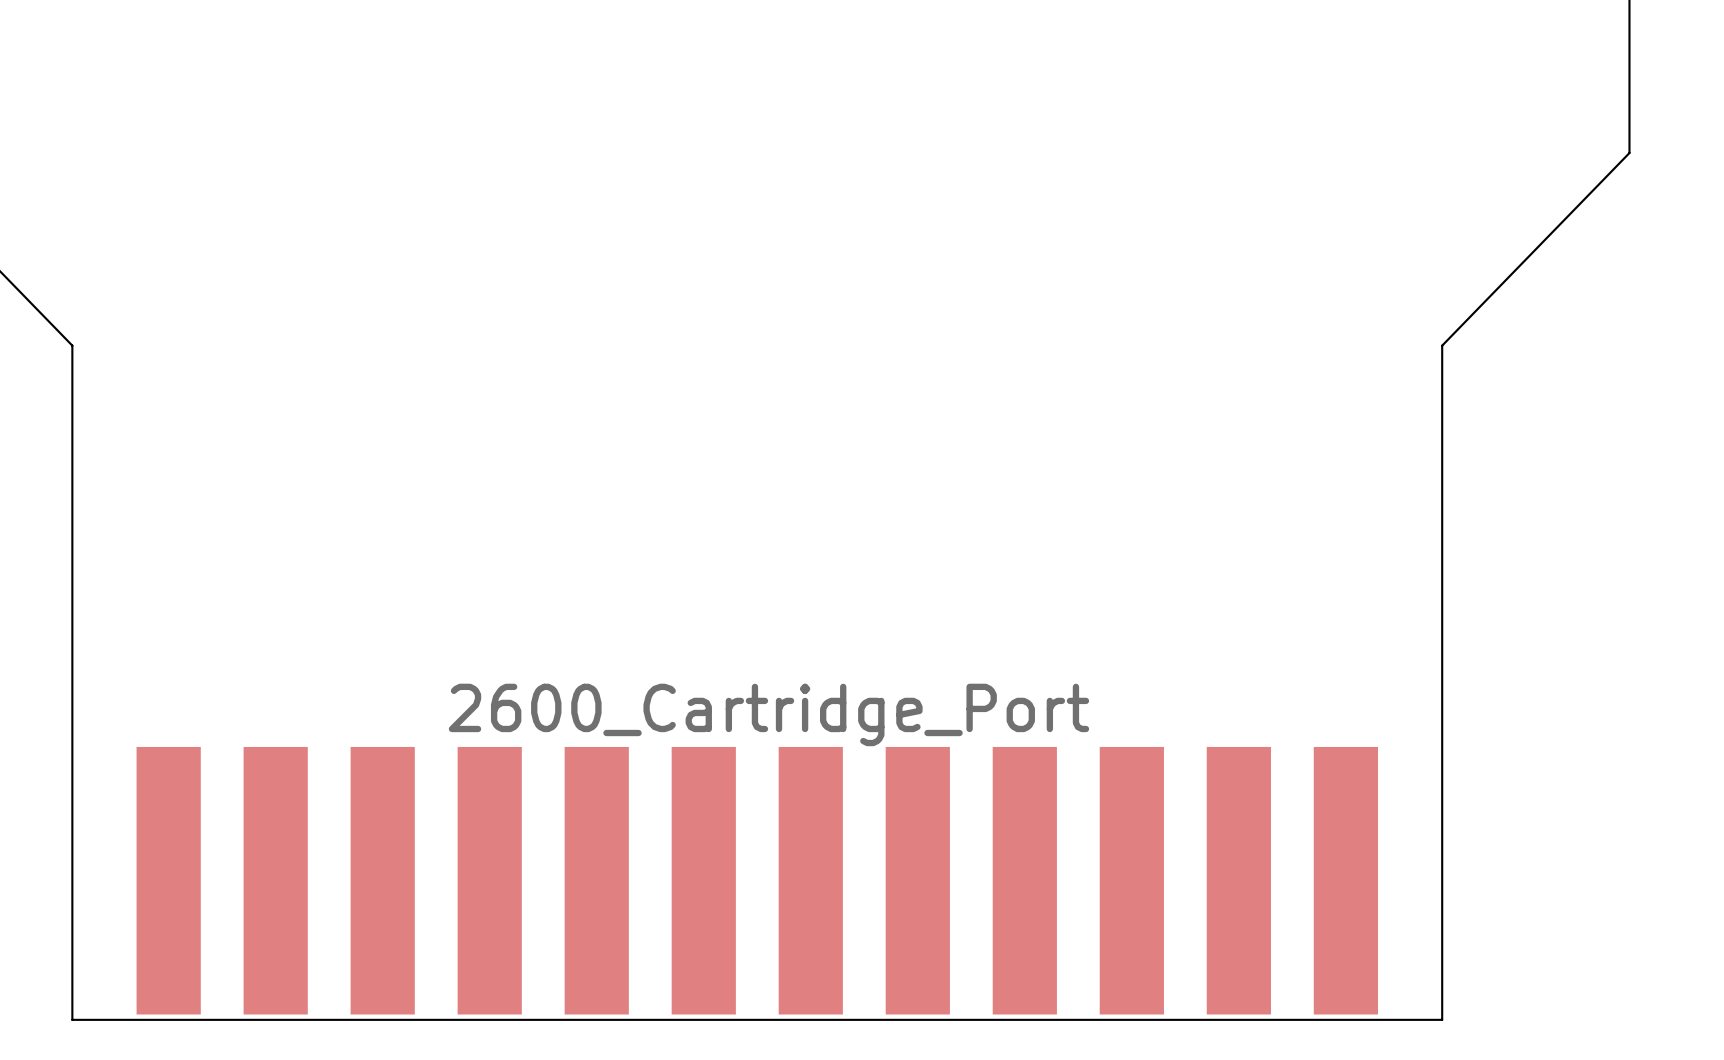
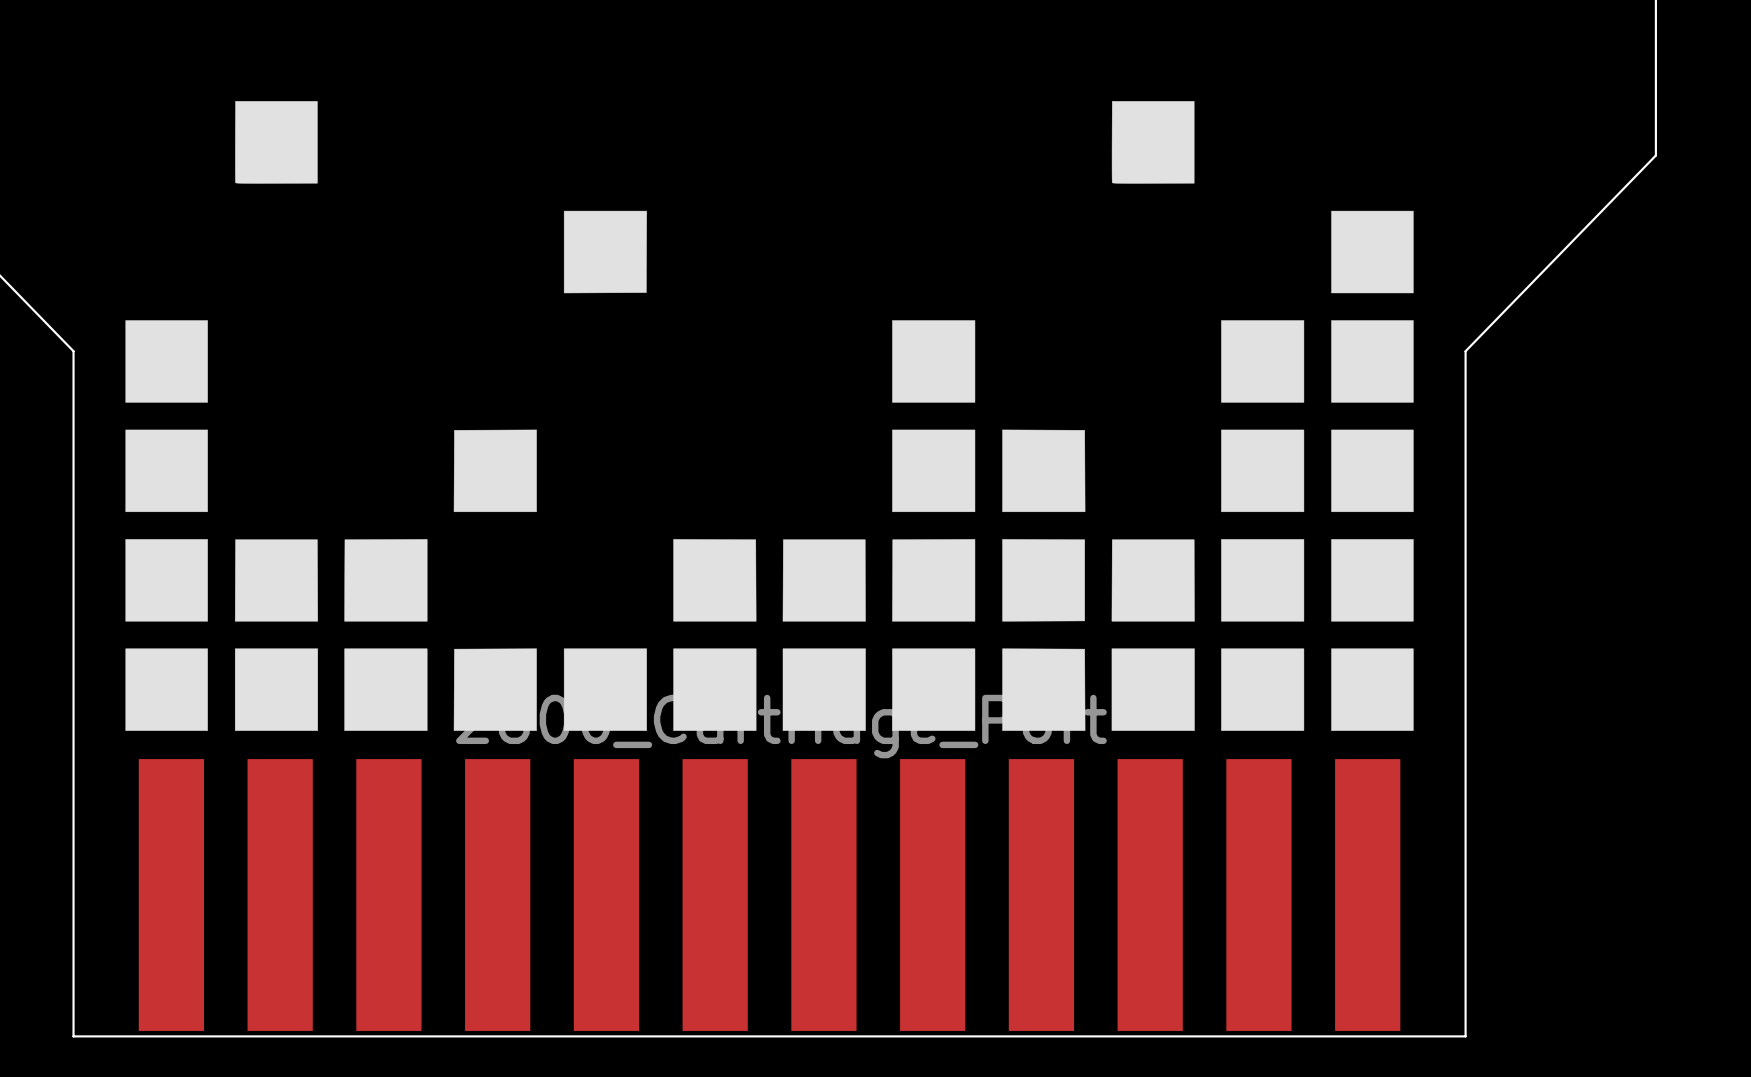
drawing: none -> [125, 101, 1414, 731]

